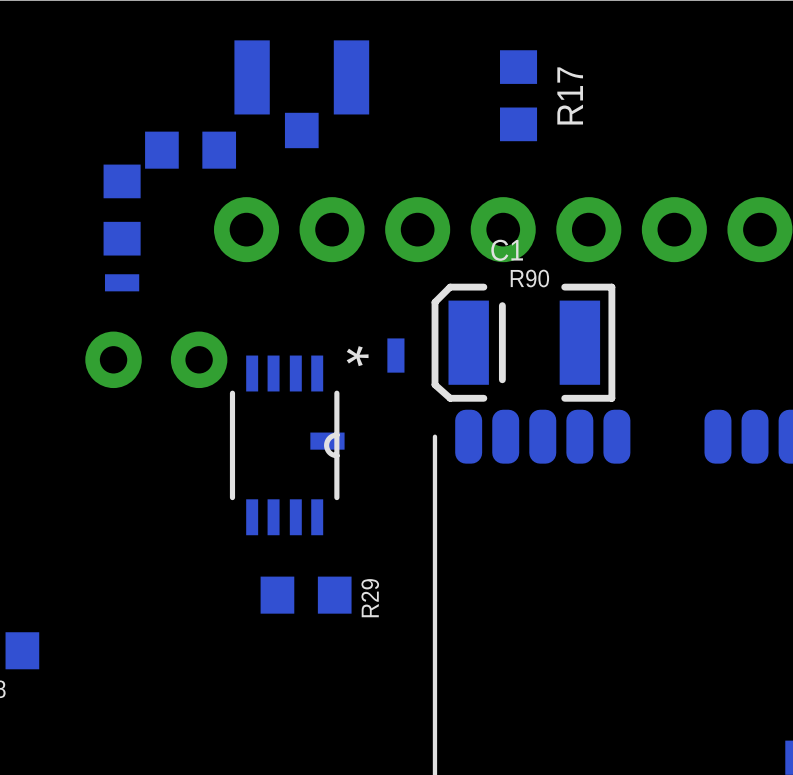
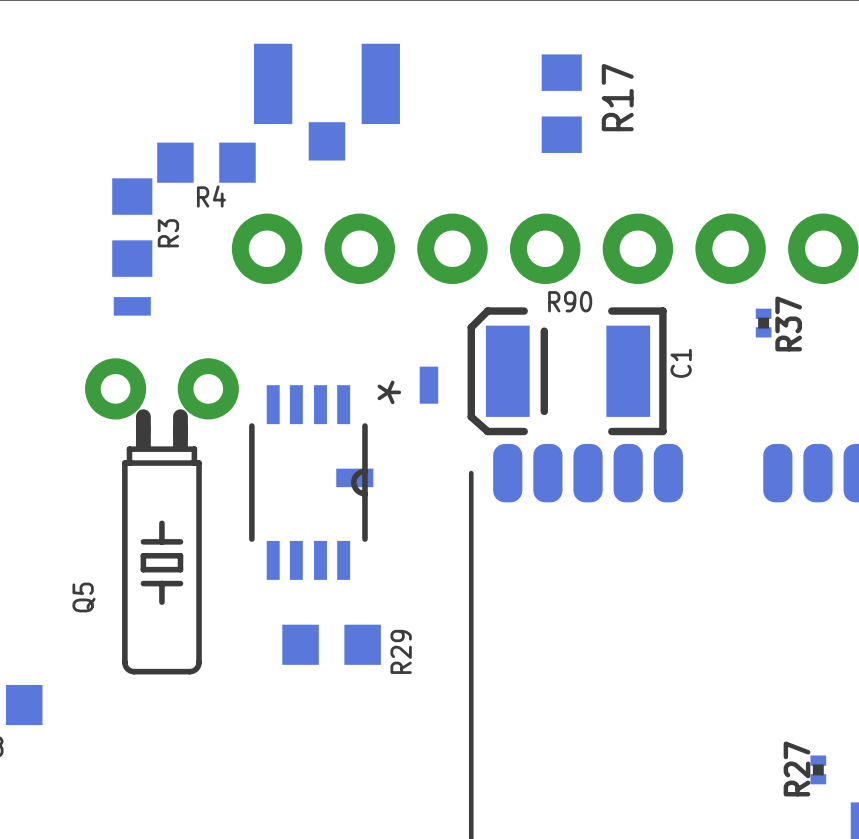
R4 name: none -> R4 (211, 196)
R3 name: none -> R3 (168, 233)
C1 name rotation: 0° (507, 250) -> 90° counterclockwise (681, 363)
C1 name position: C1 (507, 250) -> C1 (681, 363)
R37: none -> (763, 323)
Q5 side: top (156, 359) -> bottom (161, 516)
R27: none -> (818, 769)

